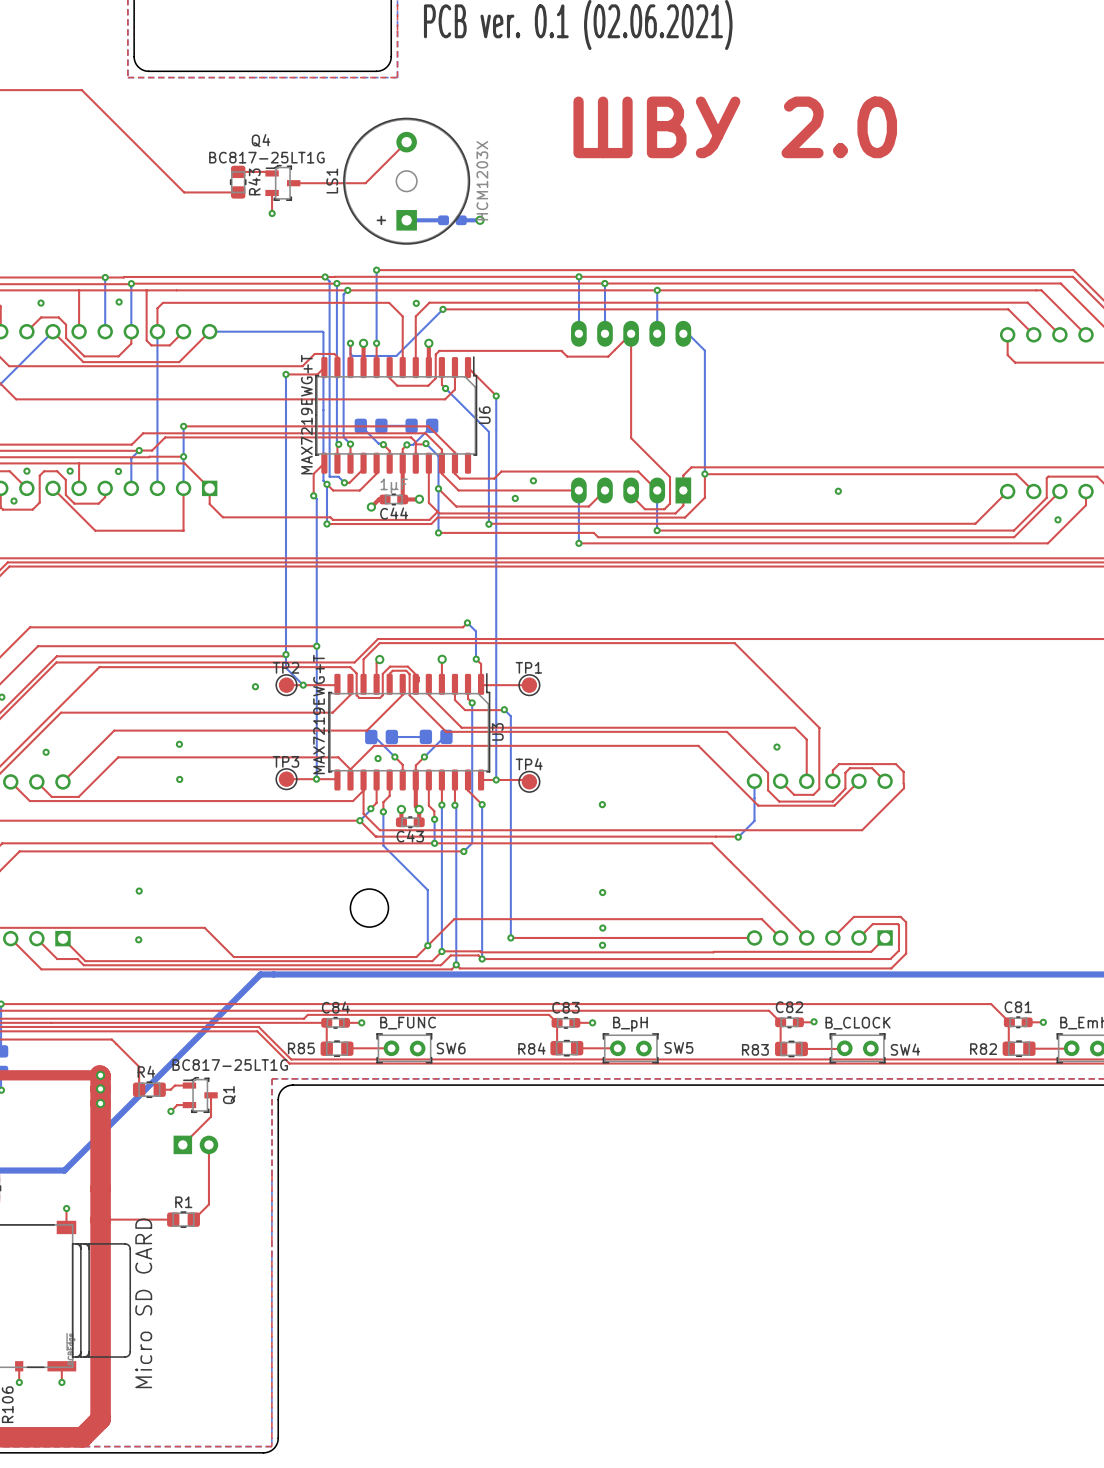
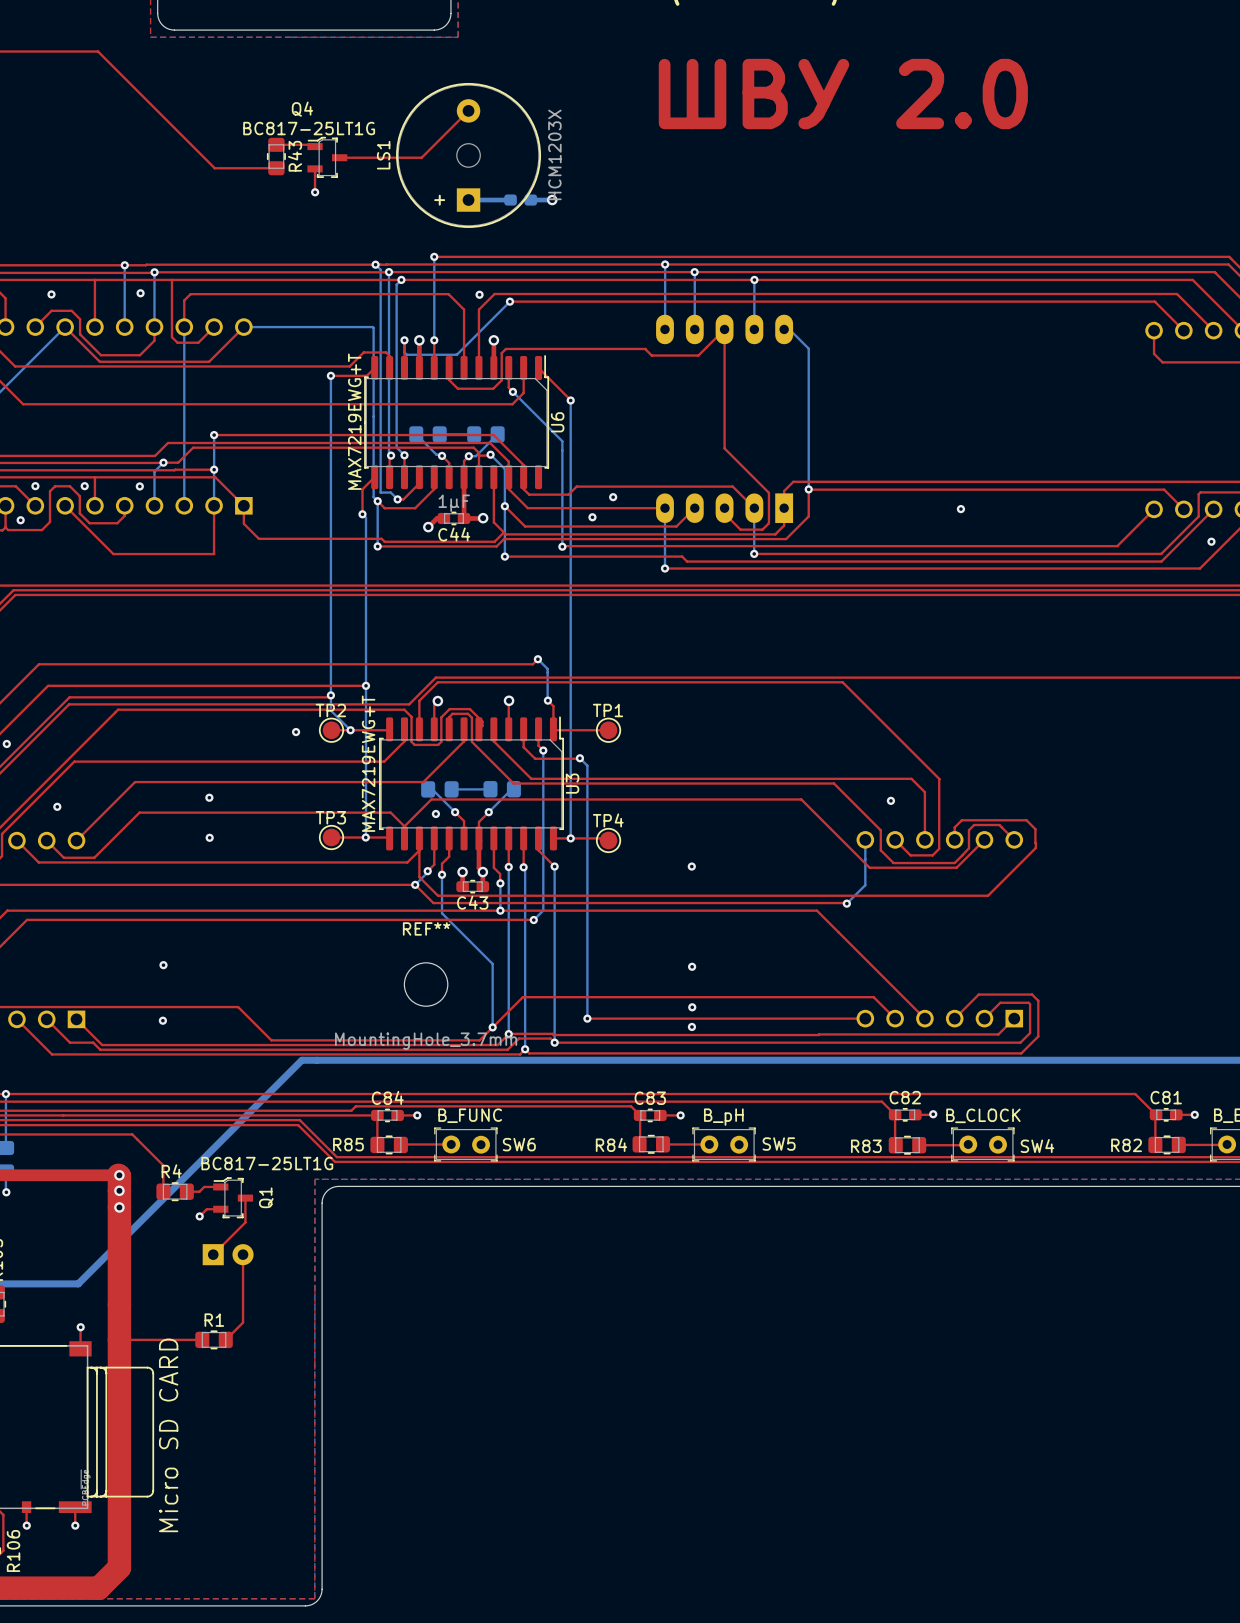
REF** name: none -> REF** (426, 928)
REF** value: none -> MountingHole_3.7mm (426, 1041)

